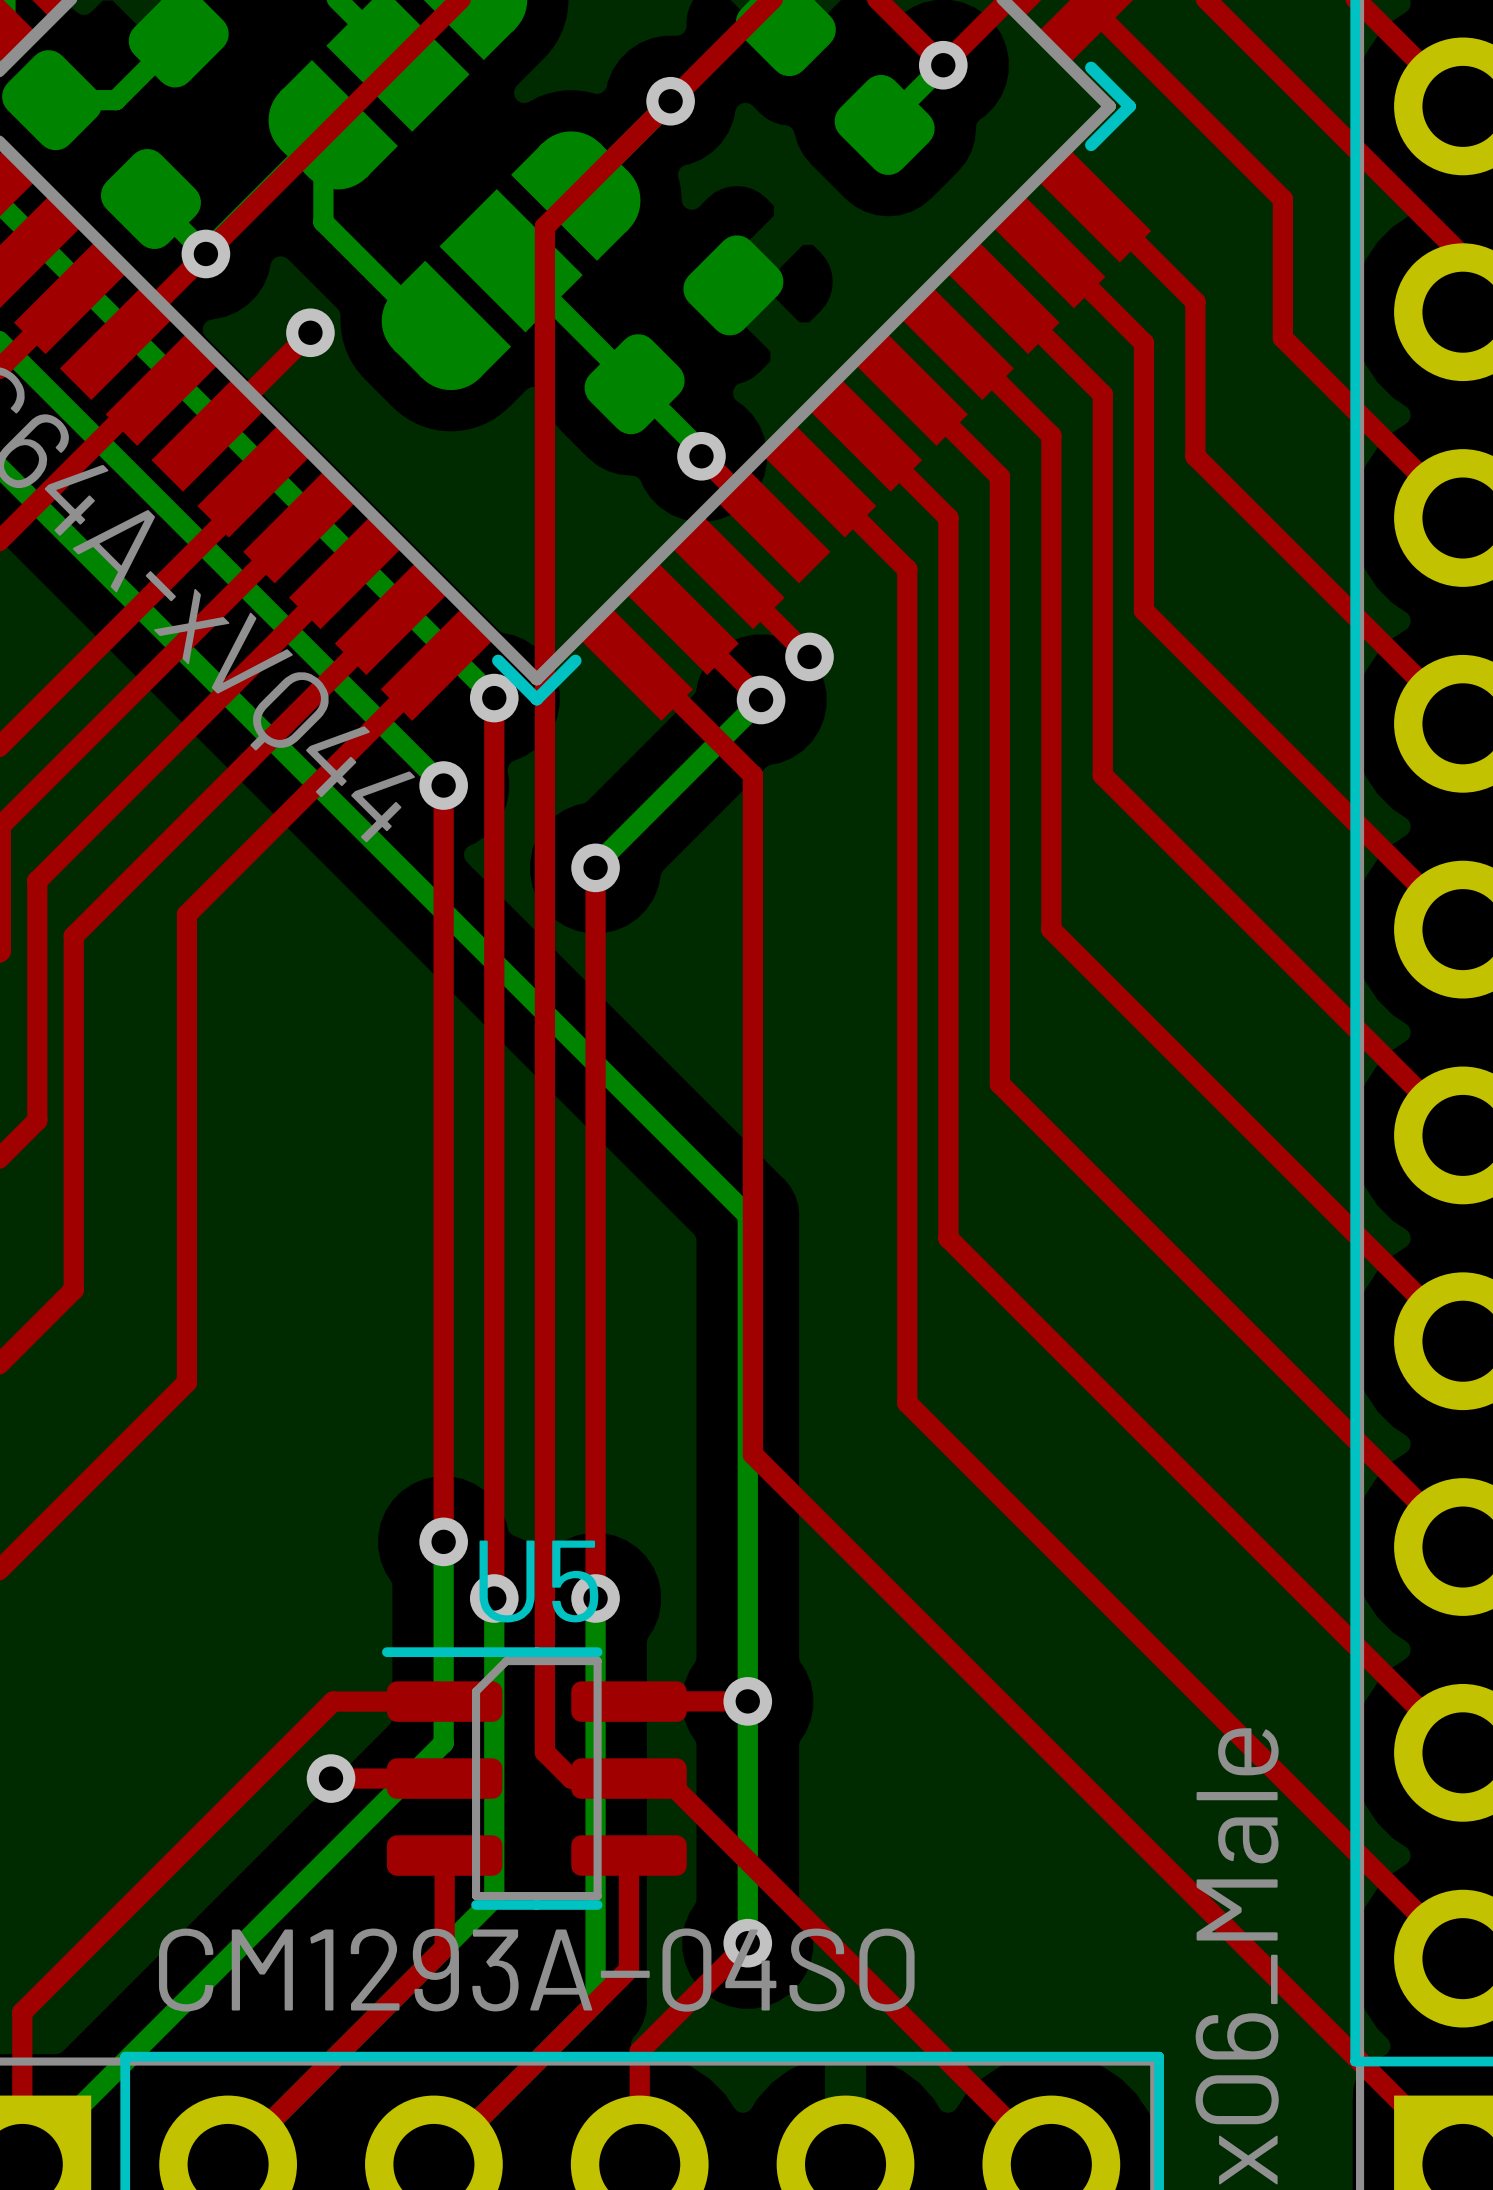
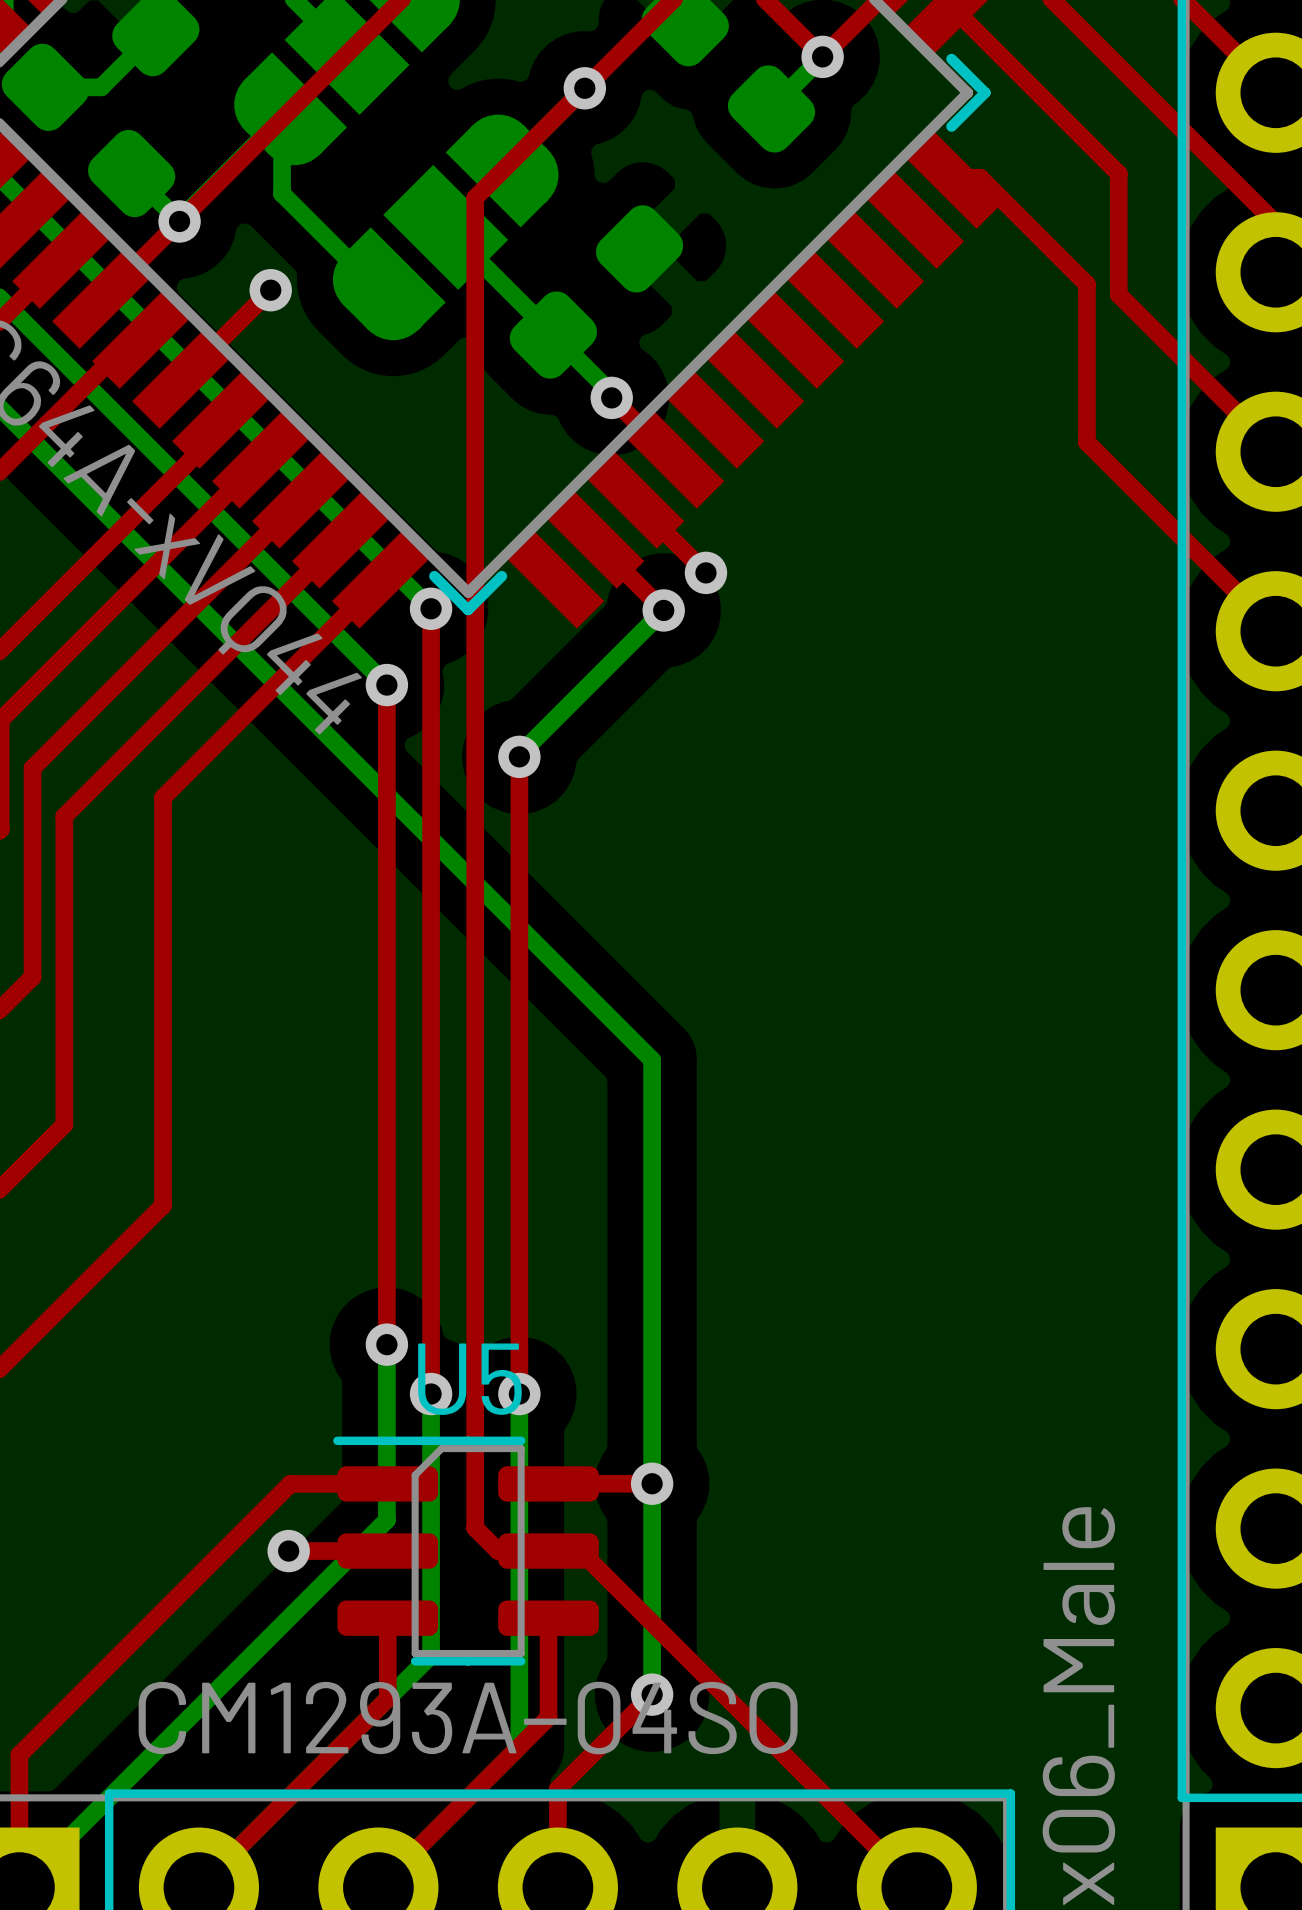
top track: (1097, 203) (1195, 301) (1195, 456) (1246, 507) -> (956, 177) (980, 177) (1086, 284) (1086, 442)
top track: (1046, 249) (1050, 249) (1143, 343) (1143, 610) (1462, 929) -> none
top track: (1000, 295) (1003, 295) (1102, 394) (1102, 775) (1462, 1135) -> none
top track: (955, 341) (1051, 435) (1051, 929) (1462, 1341) -> none
top track: (910, 387) (999, 476) (999, 1083) (1462, 1547) -> none
top track: (863, 432) (948, 518) (948, 1238) (1462, 1752) -> none
top track: (817, 479) (907, 569) (907, 1402) (1462, 1958) -> none
top track: (634, 662) (639, 662) (752, 775) (752, 1454) (1462, 2164) -> none

